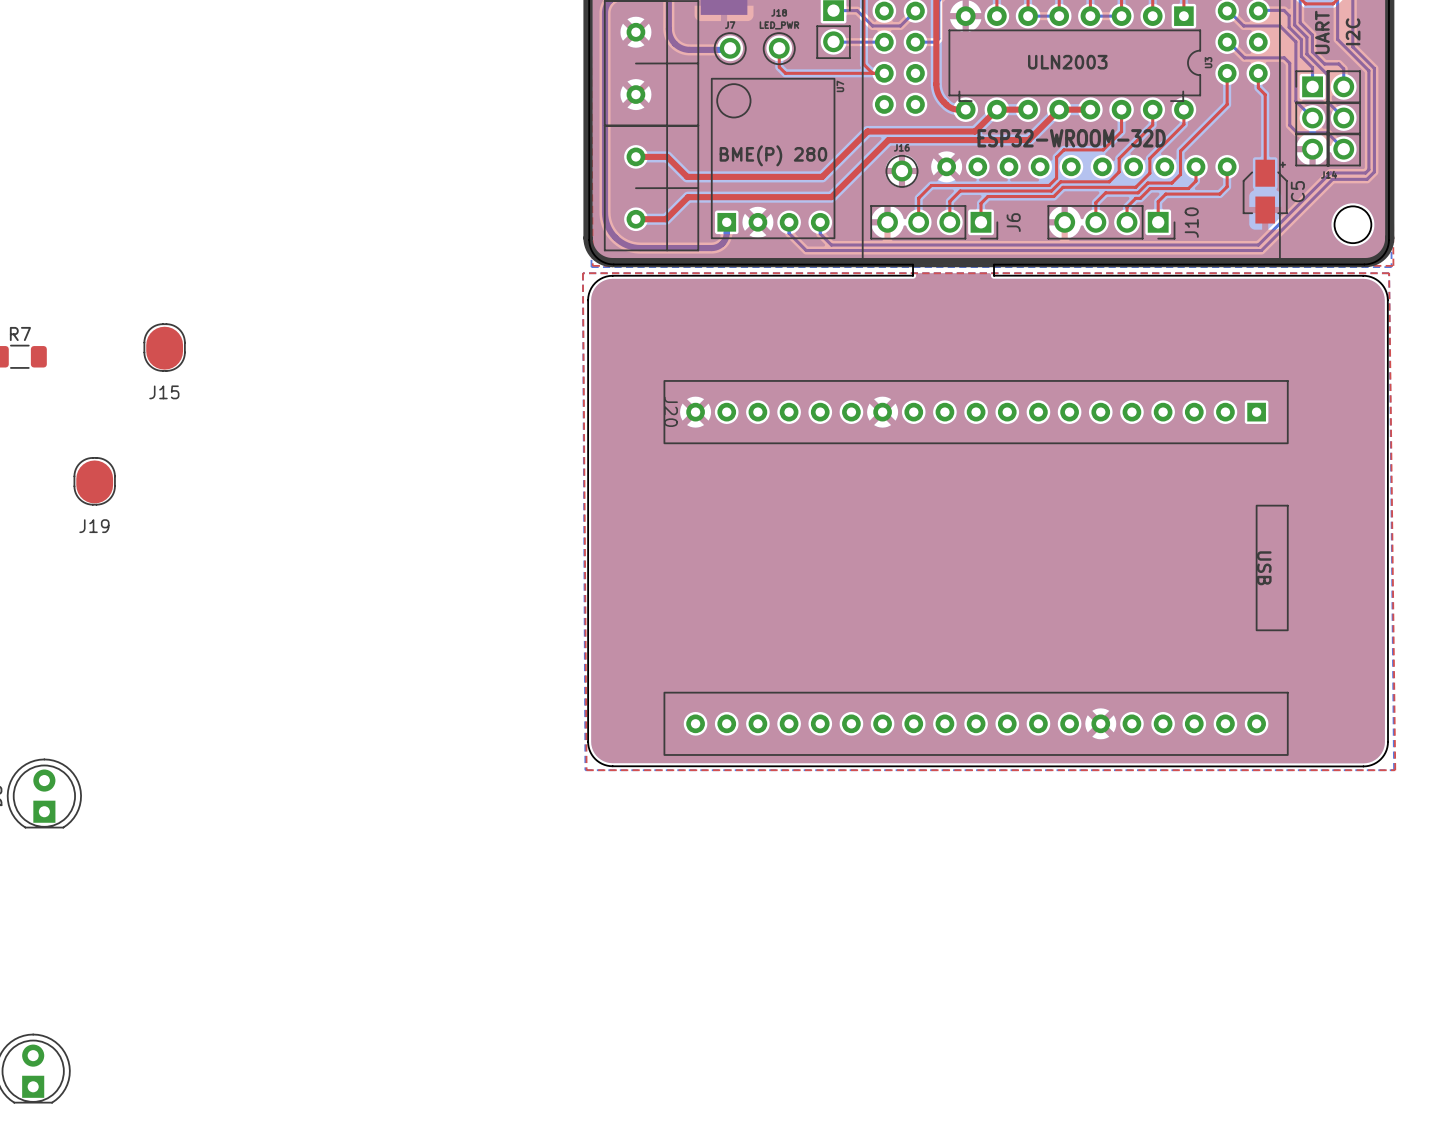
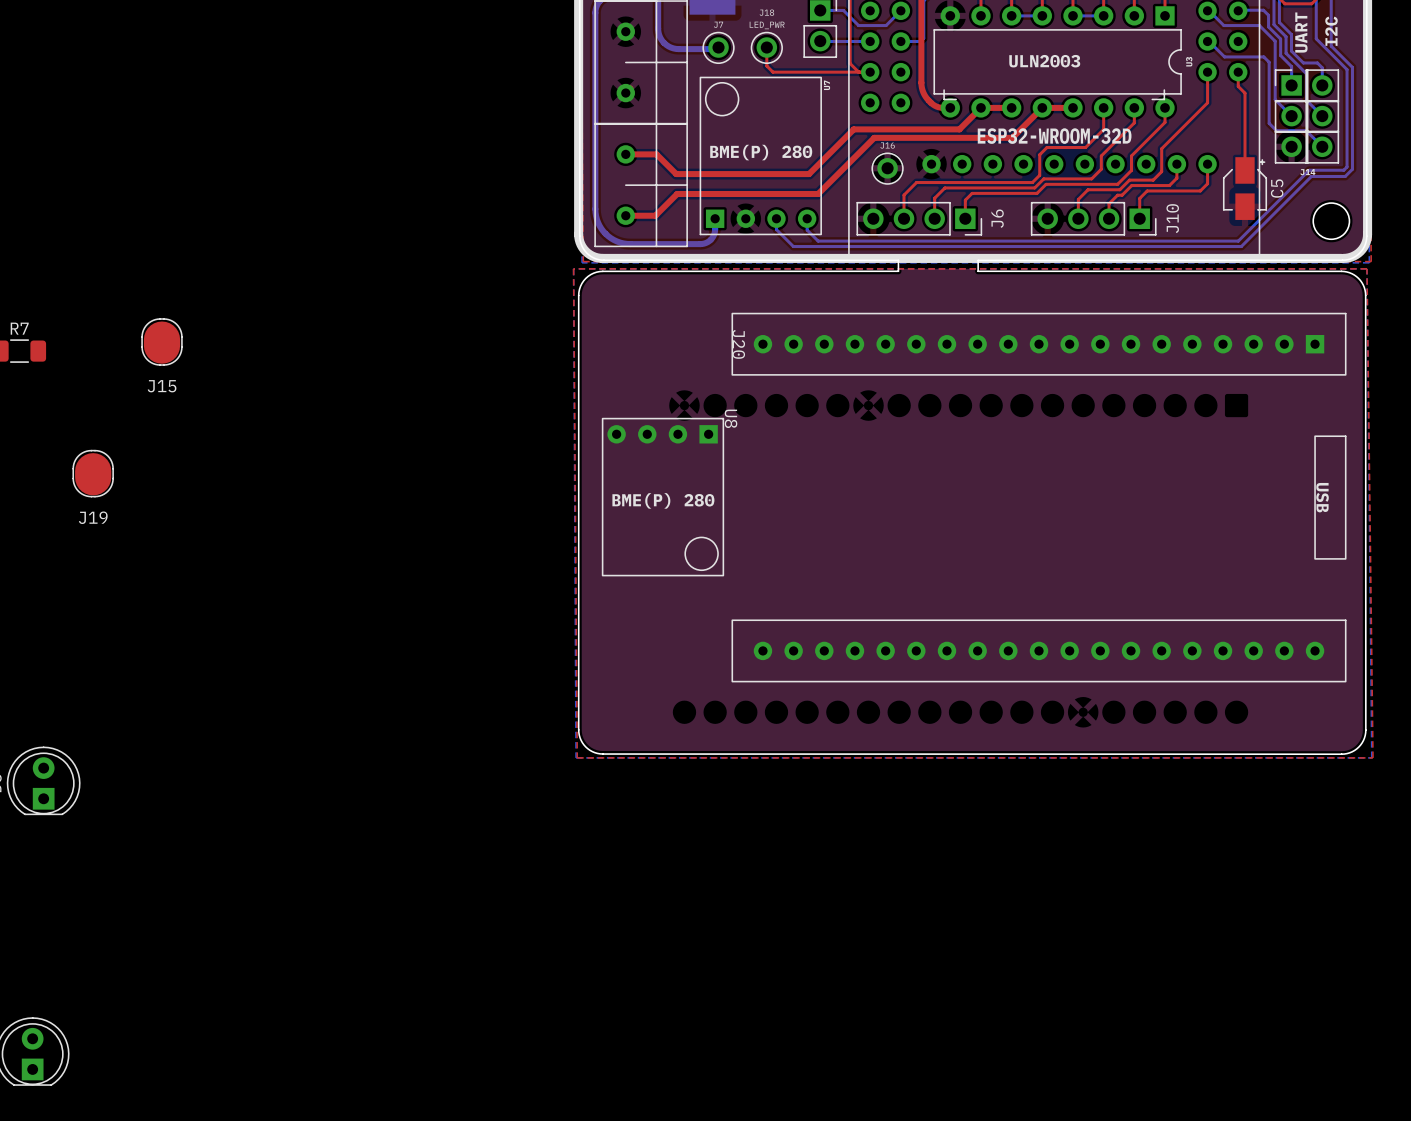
U8: none -> (662, 497)
J20 position: (976, 567) -> (1039, 497)

